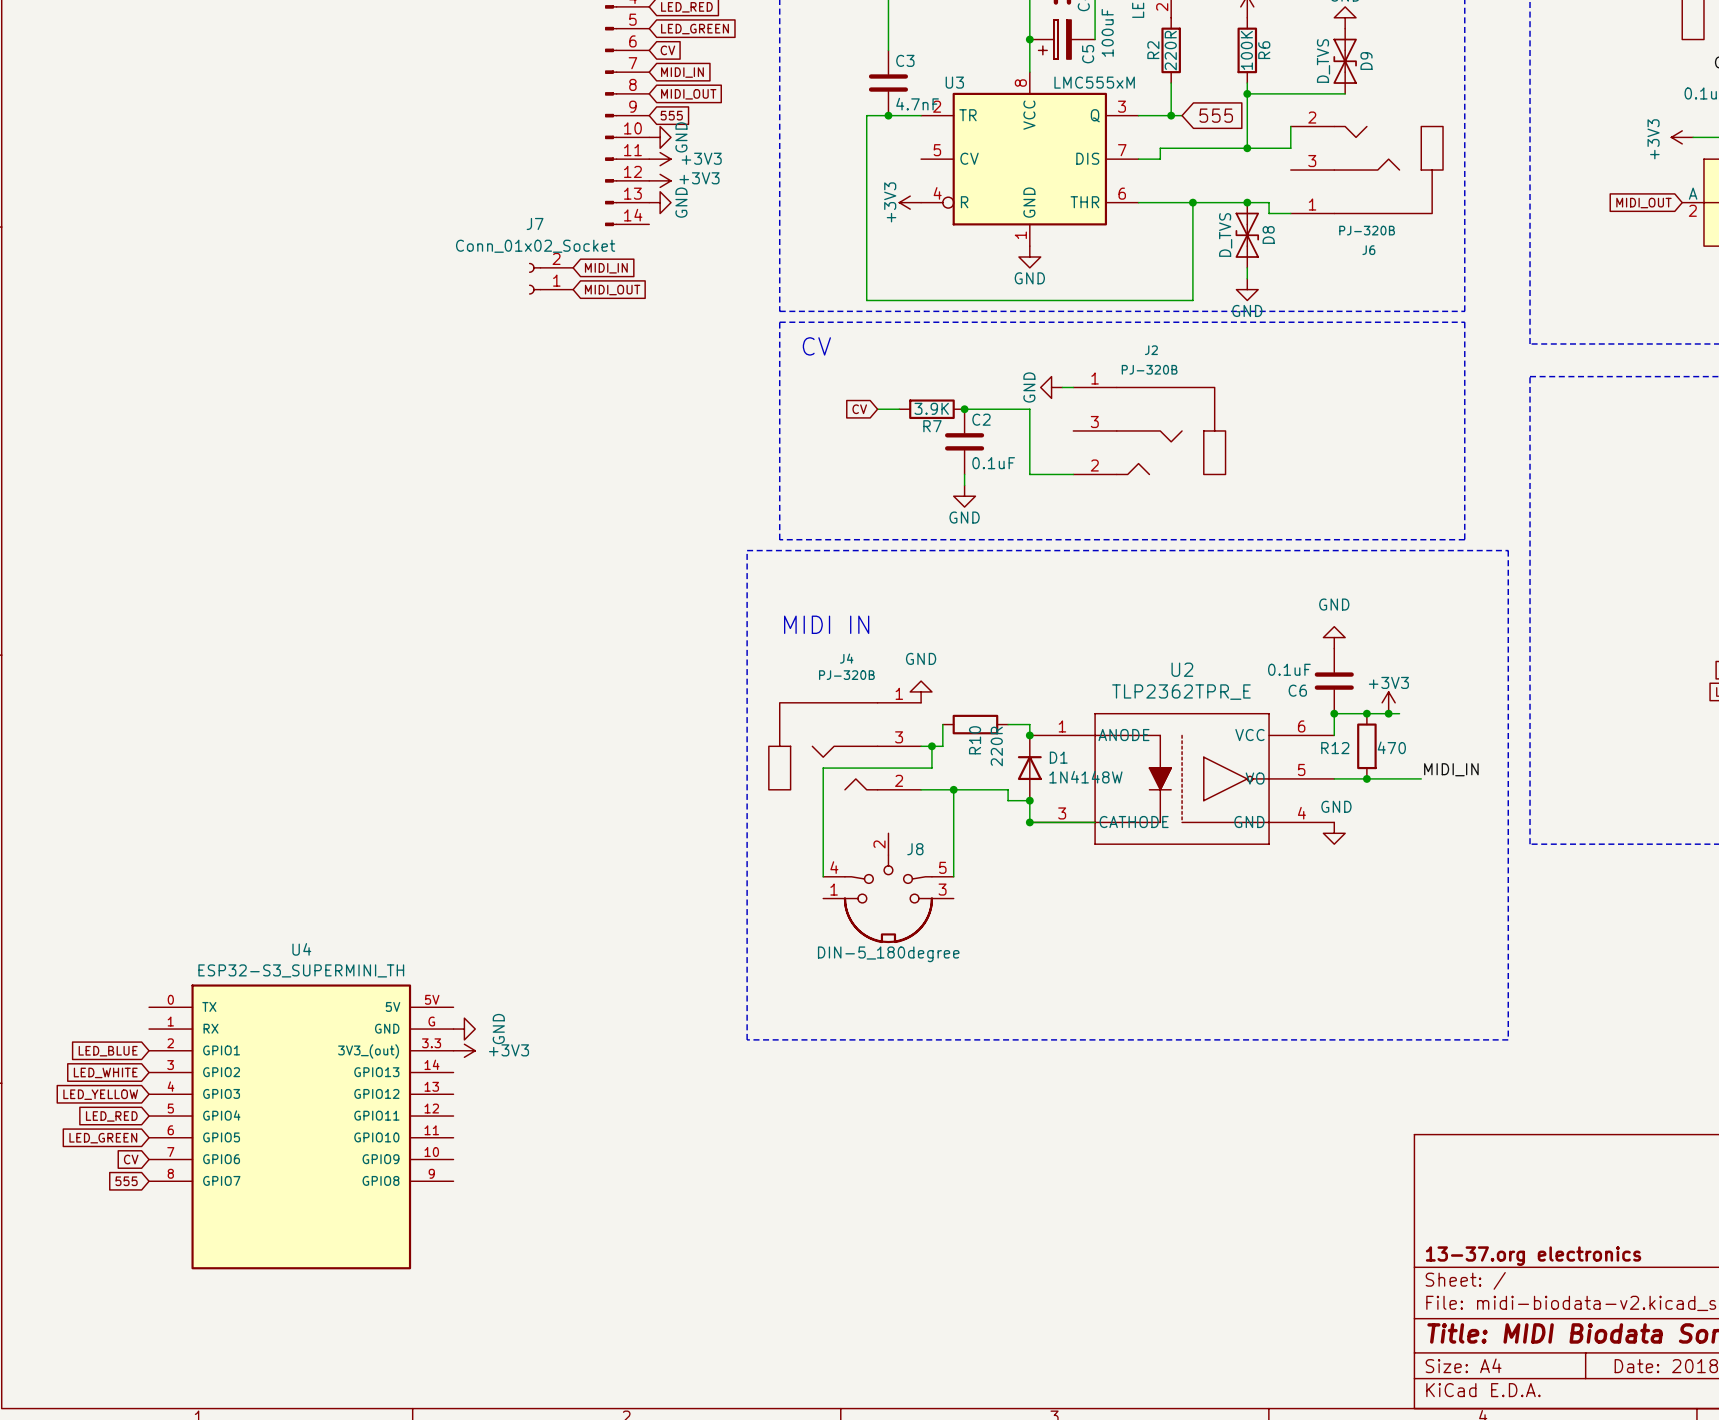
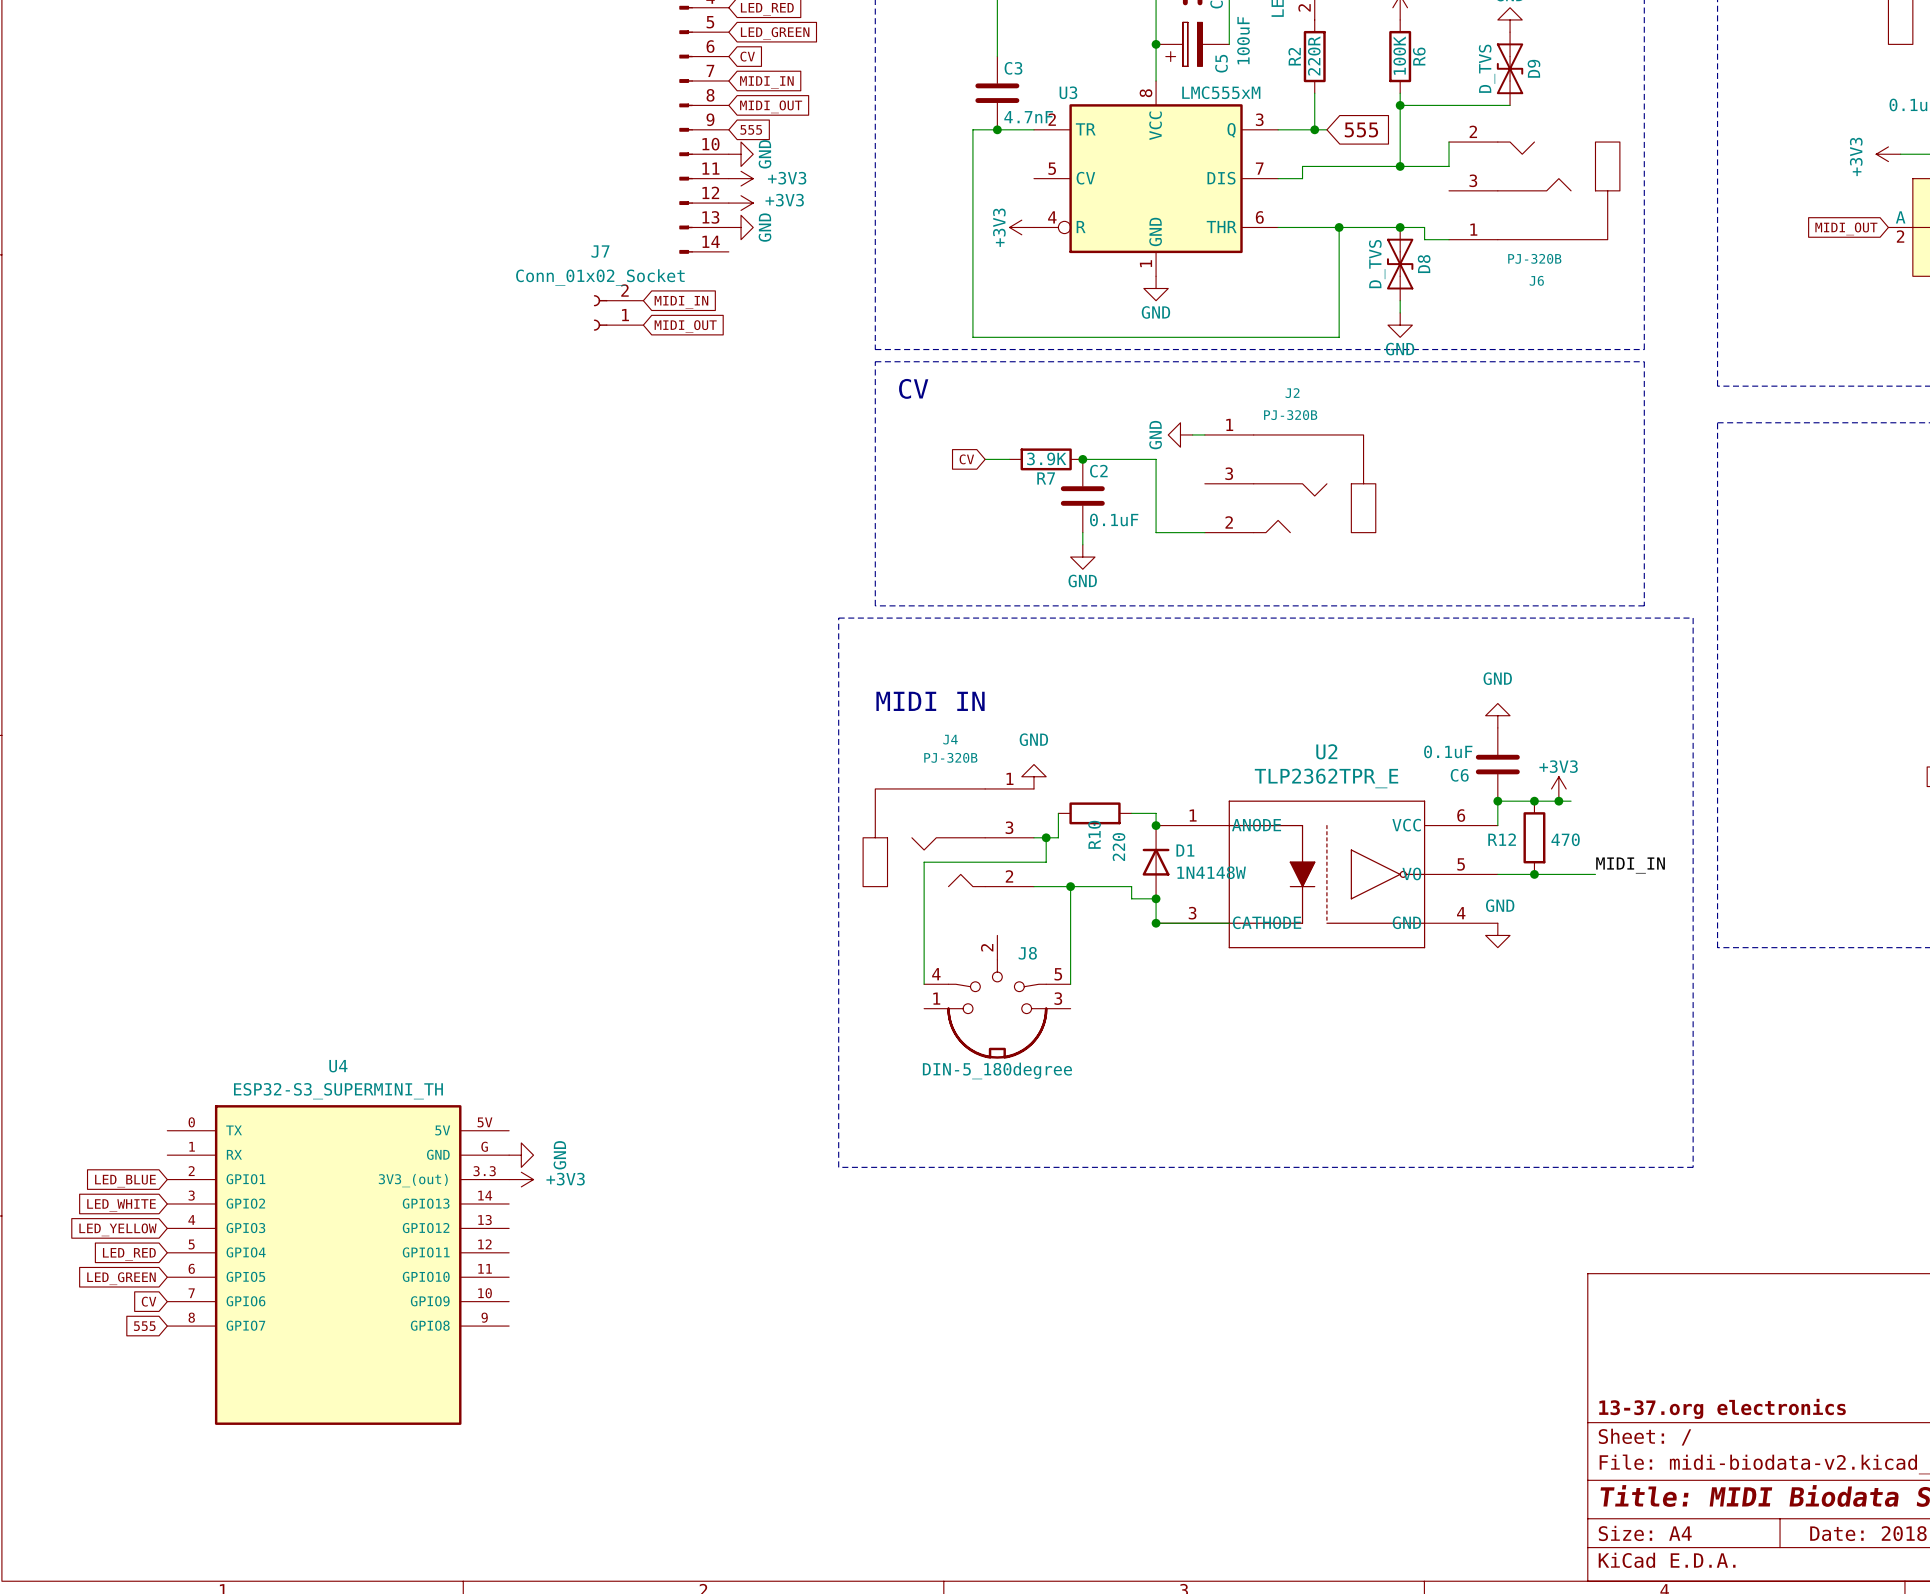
R10 value: 220R (996, 746) -> 220 (1118, 847)

